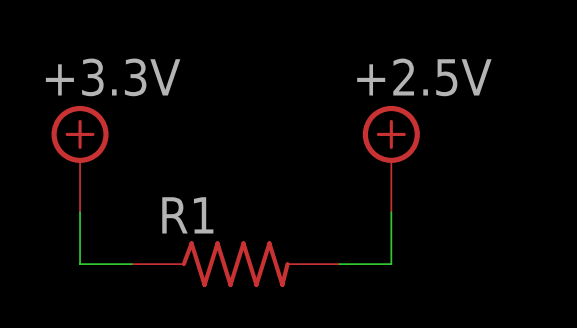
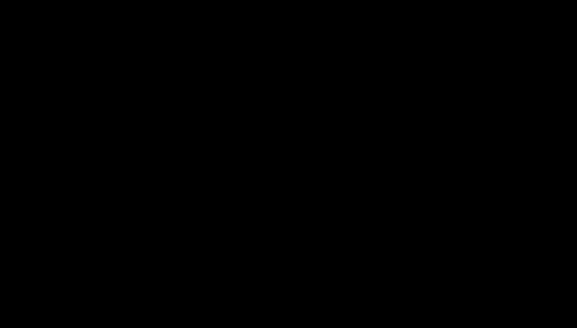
power symbol: +3.3V (80, 159) -> none
power symbol: +2.5V (391, 159) -> none
wire: (80, 212) (80, 264) (131, 264) -> none
wire: (391, 212) (391, 264) (339, 264) -> none
R1: (235, 264) -> none

